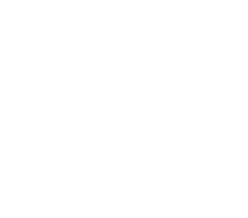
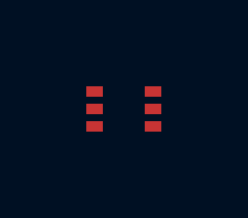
part: none -> (123, 108)

